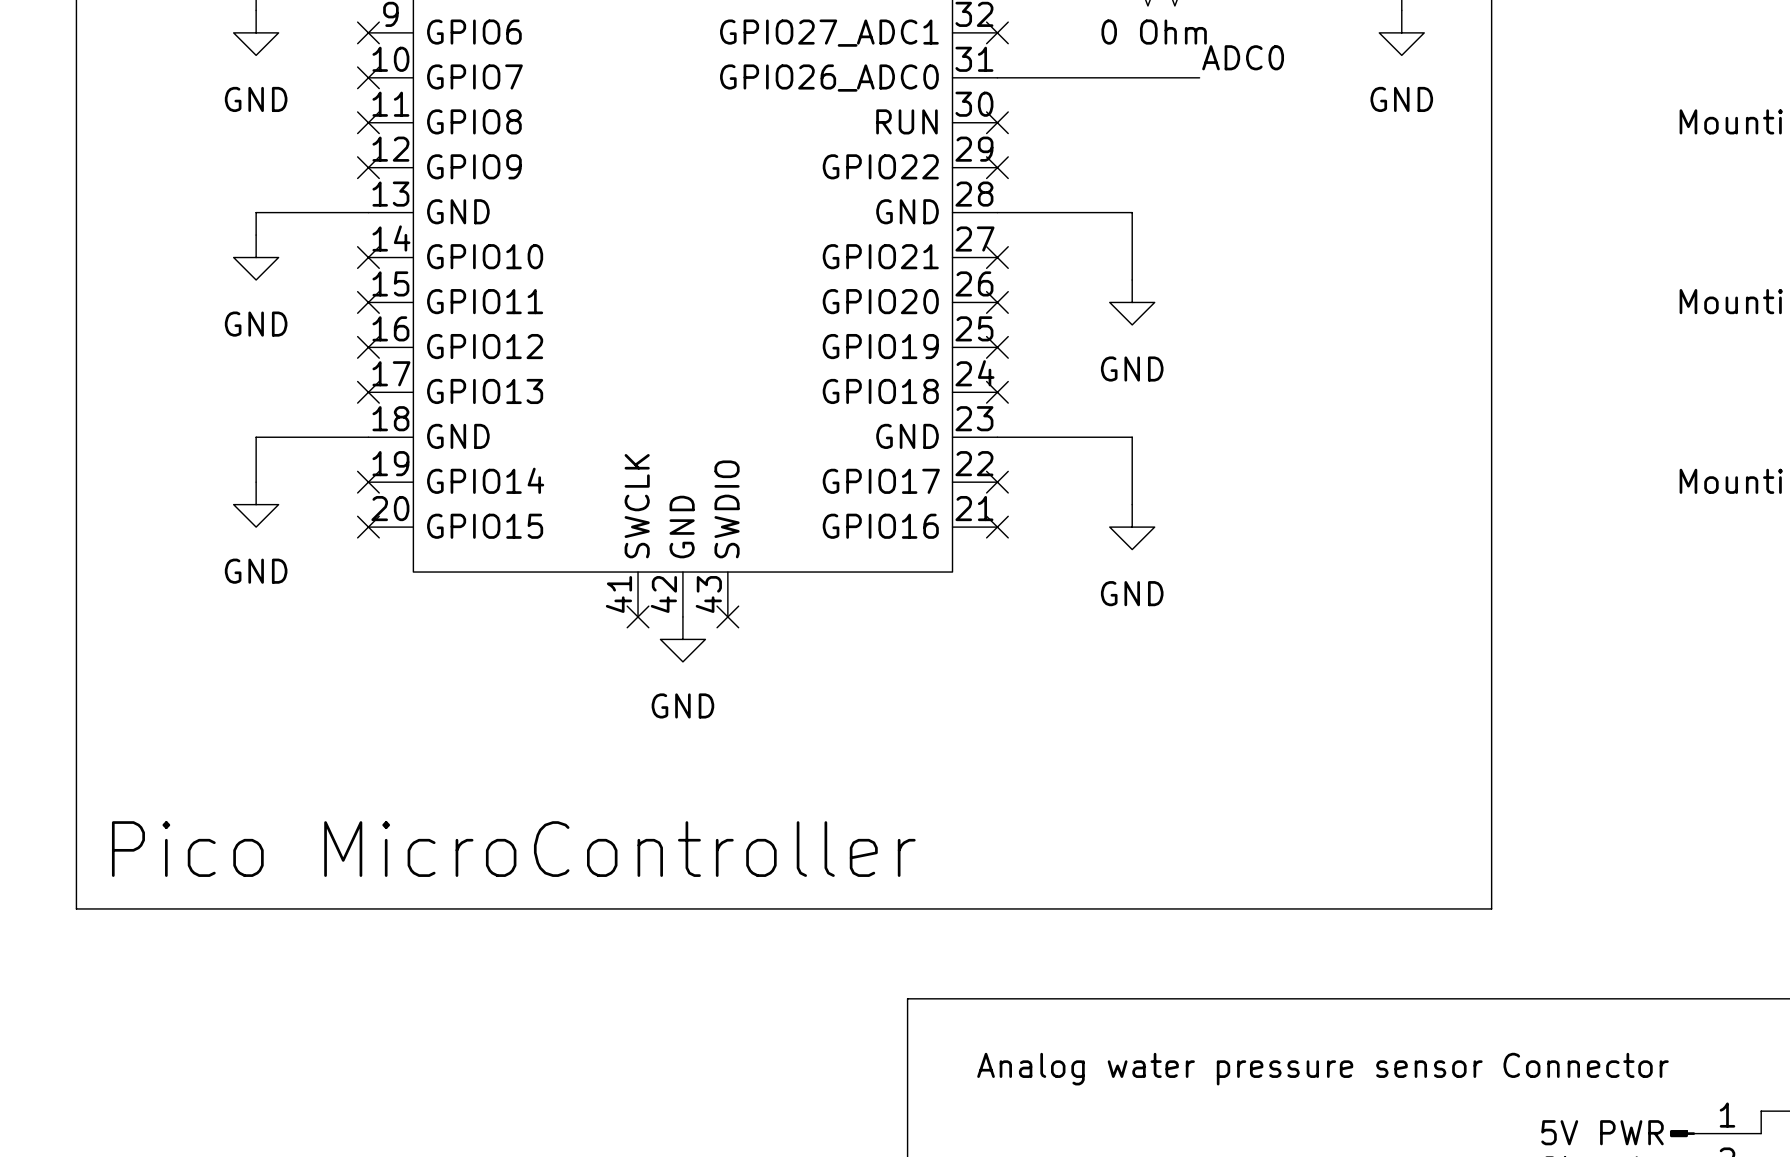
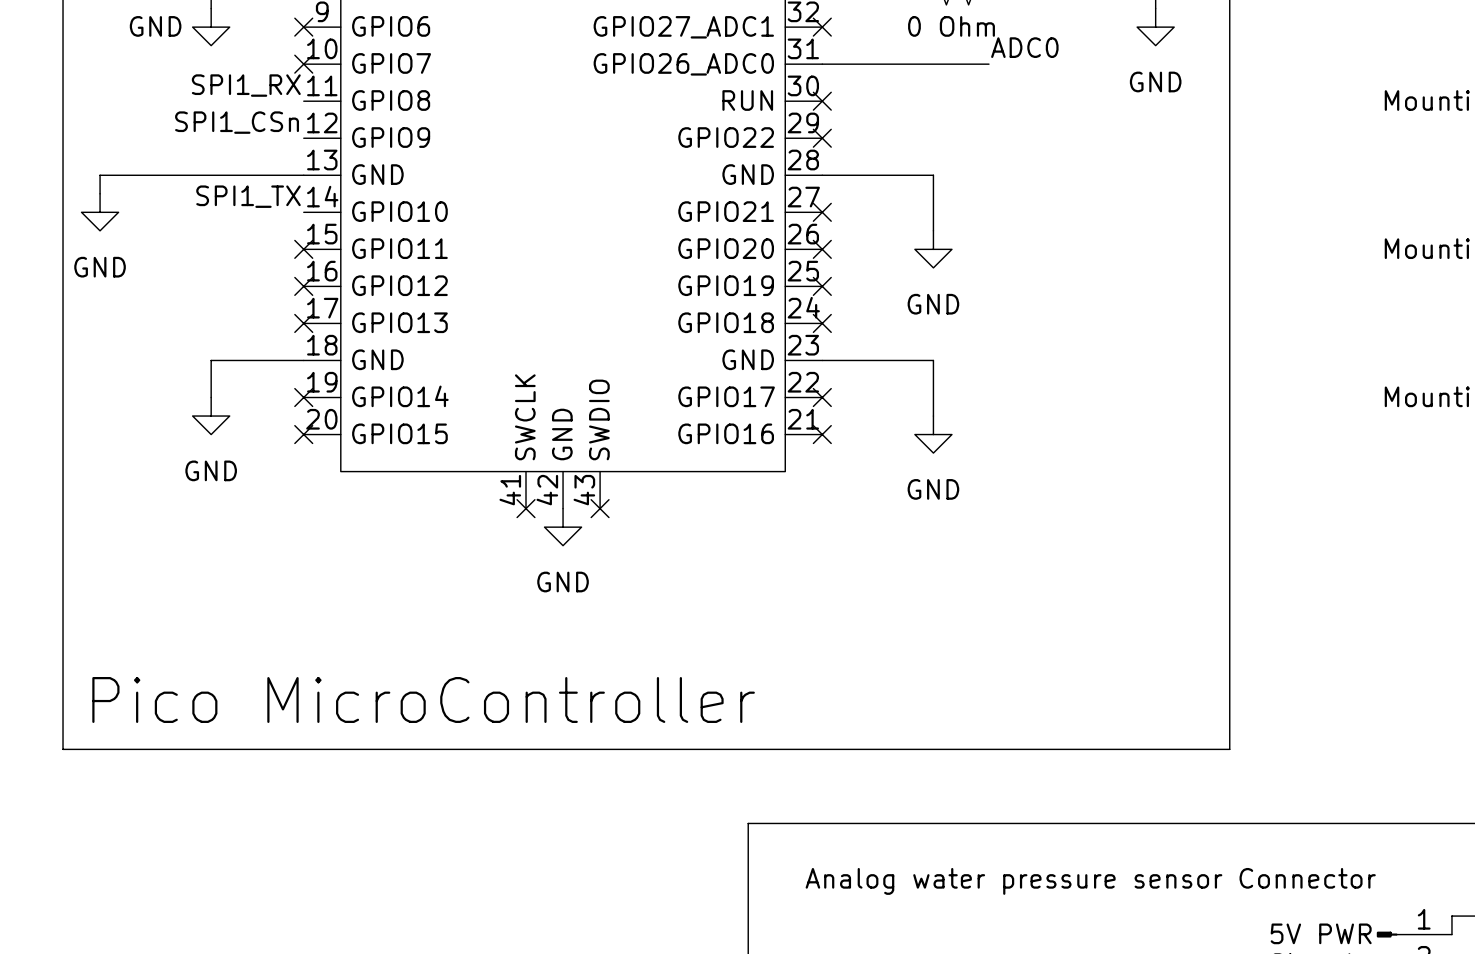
power symbol text position: GND (256, 99) -> GND (155, 26)
label: none -> SPI1_RX (246, 85)
no-connect mark: (368, 122) -> none
label: none -> SPI1_CSn (237, 122)
no-connect mark: (368, 167) -> none
wire: (256, 212) (256, 235) -> (211, 175) (100, 175) (100, 193)
label: none -> SPI1_TX (248, 196)
power symbol position: GND (256, 257) -> GND (100, 212)
no-connect mark: (368, 257) -> none

